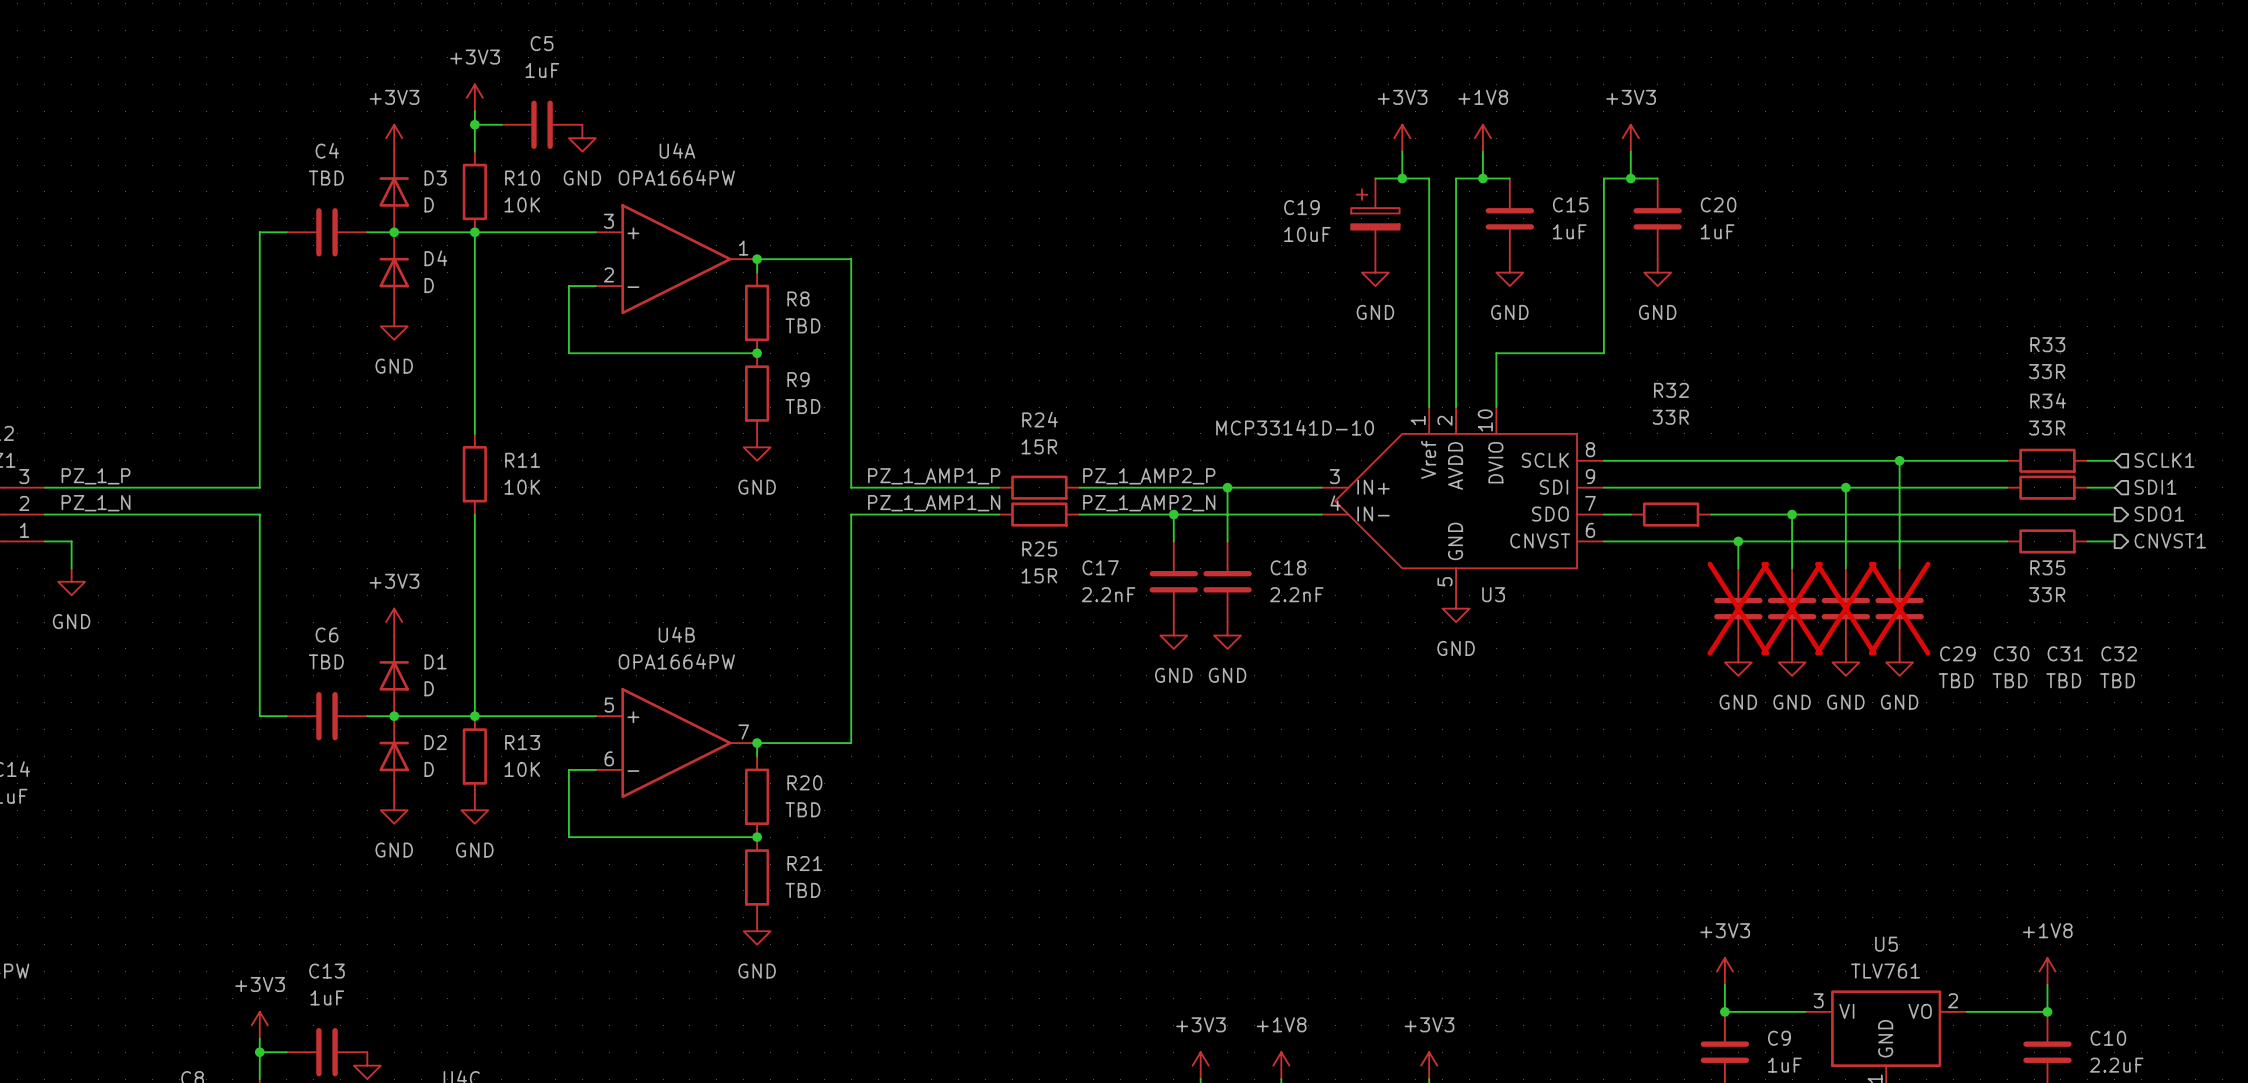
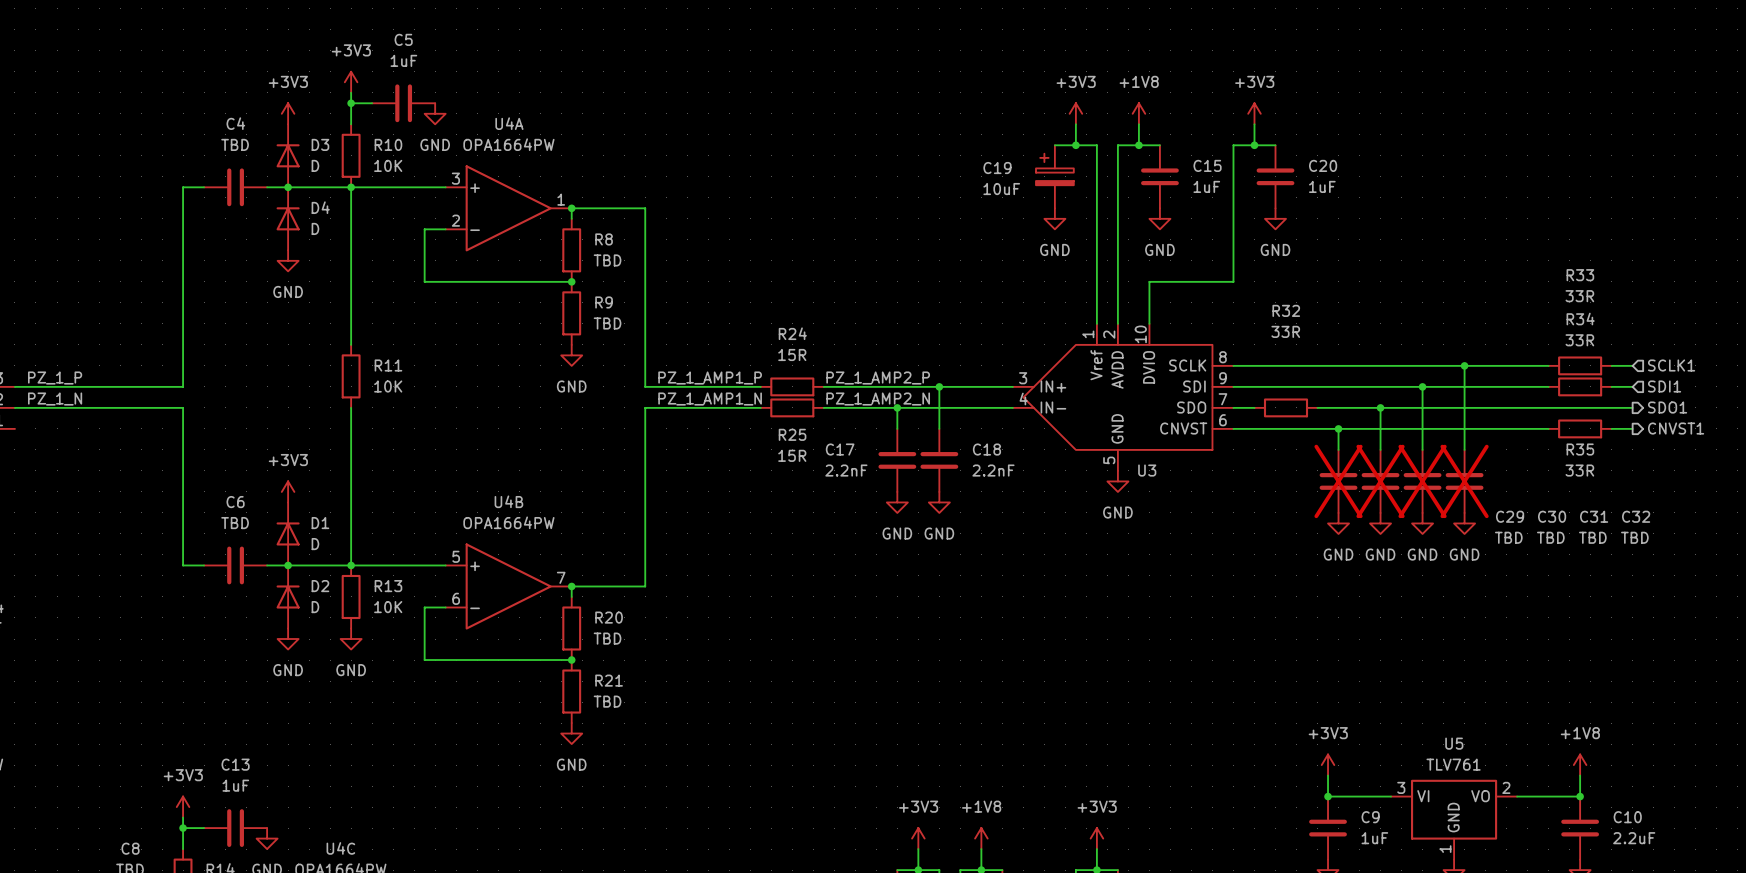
U3 value: MCP33141D-10 (1295, 427) -> none
wire: (44, 541) (71, 541) (71, 568) -> none
power symbol: GND (71, 581) -> none

